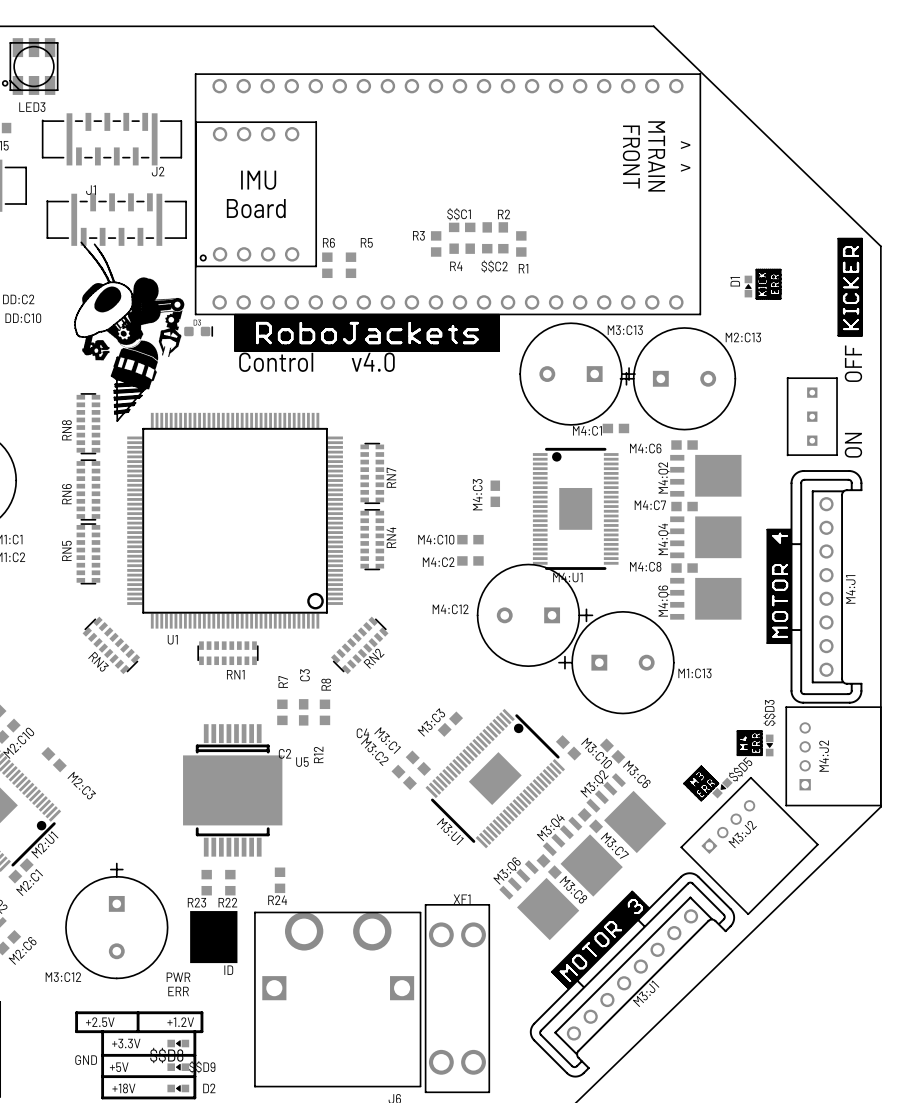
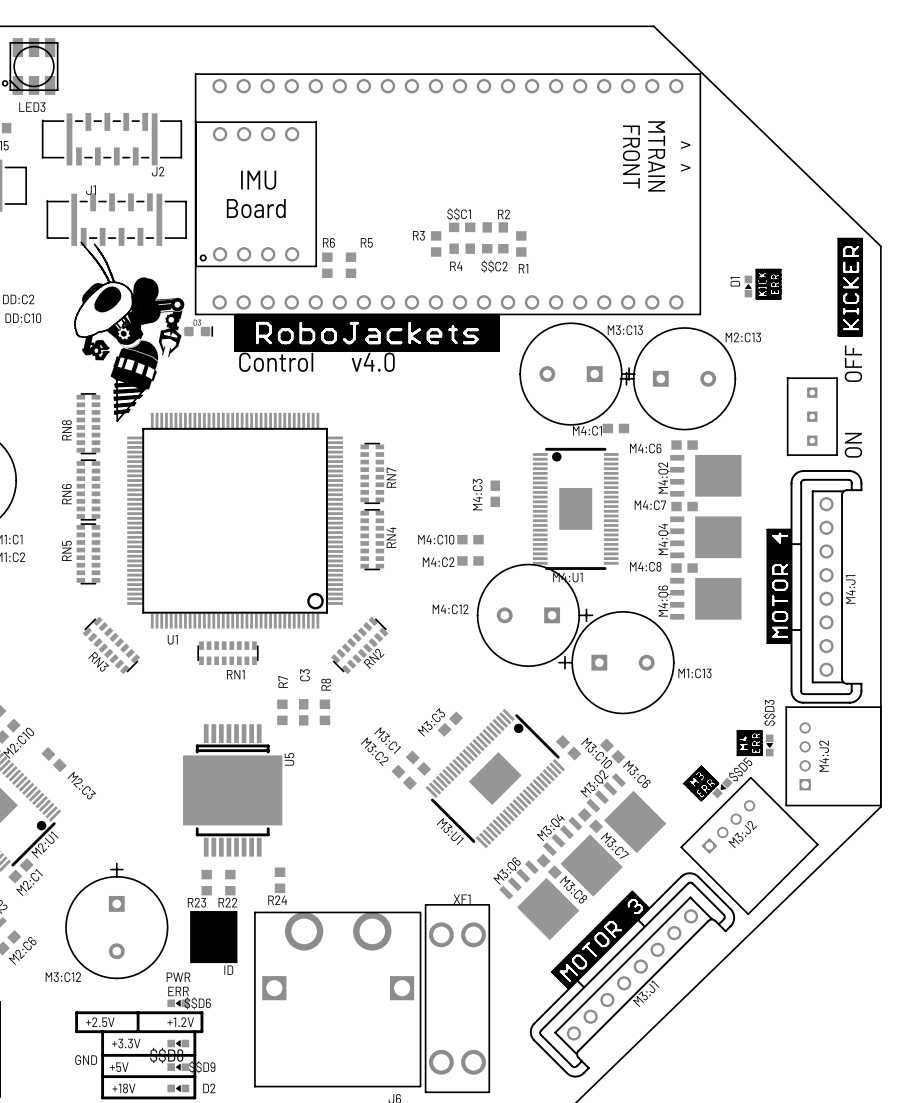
C4: (362, 733) -> none
C2: (285, 753) -> none
R12: (318, 754) -> none
U5 name rotation: 0° (302, 762) -> 90° counterclockwise (289, 759)
$$D6: none -> (178, 1003)

